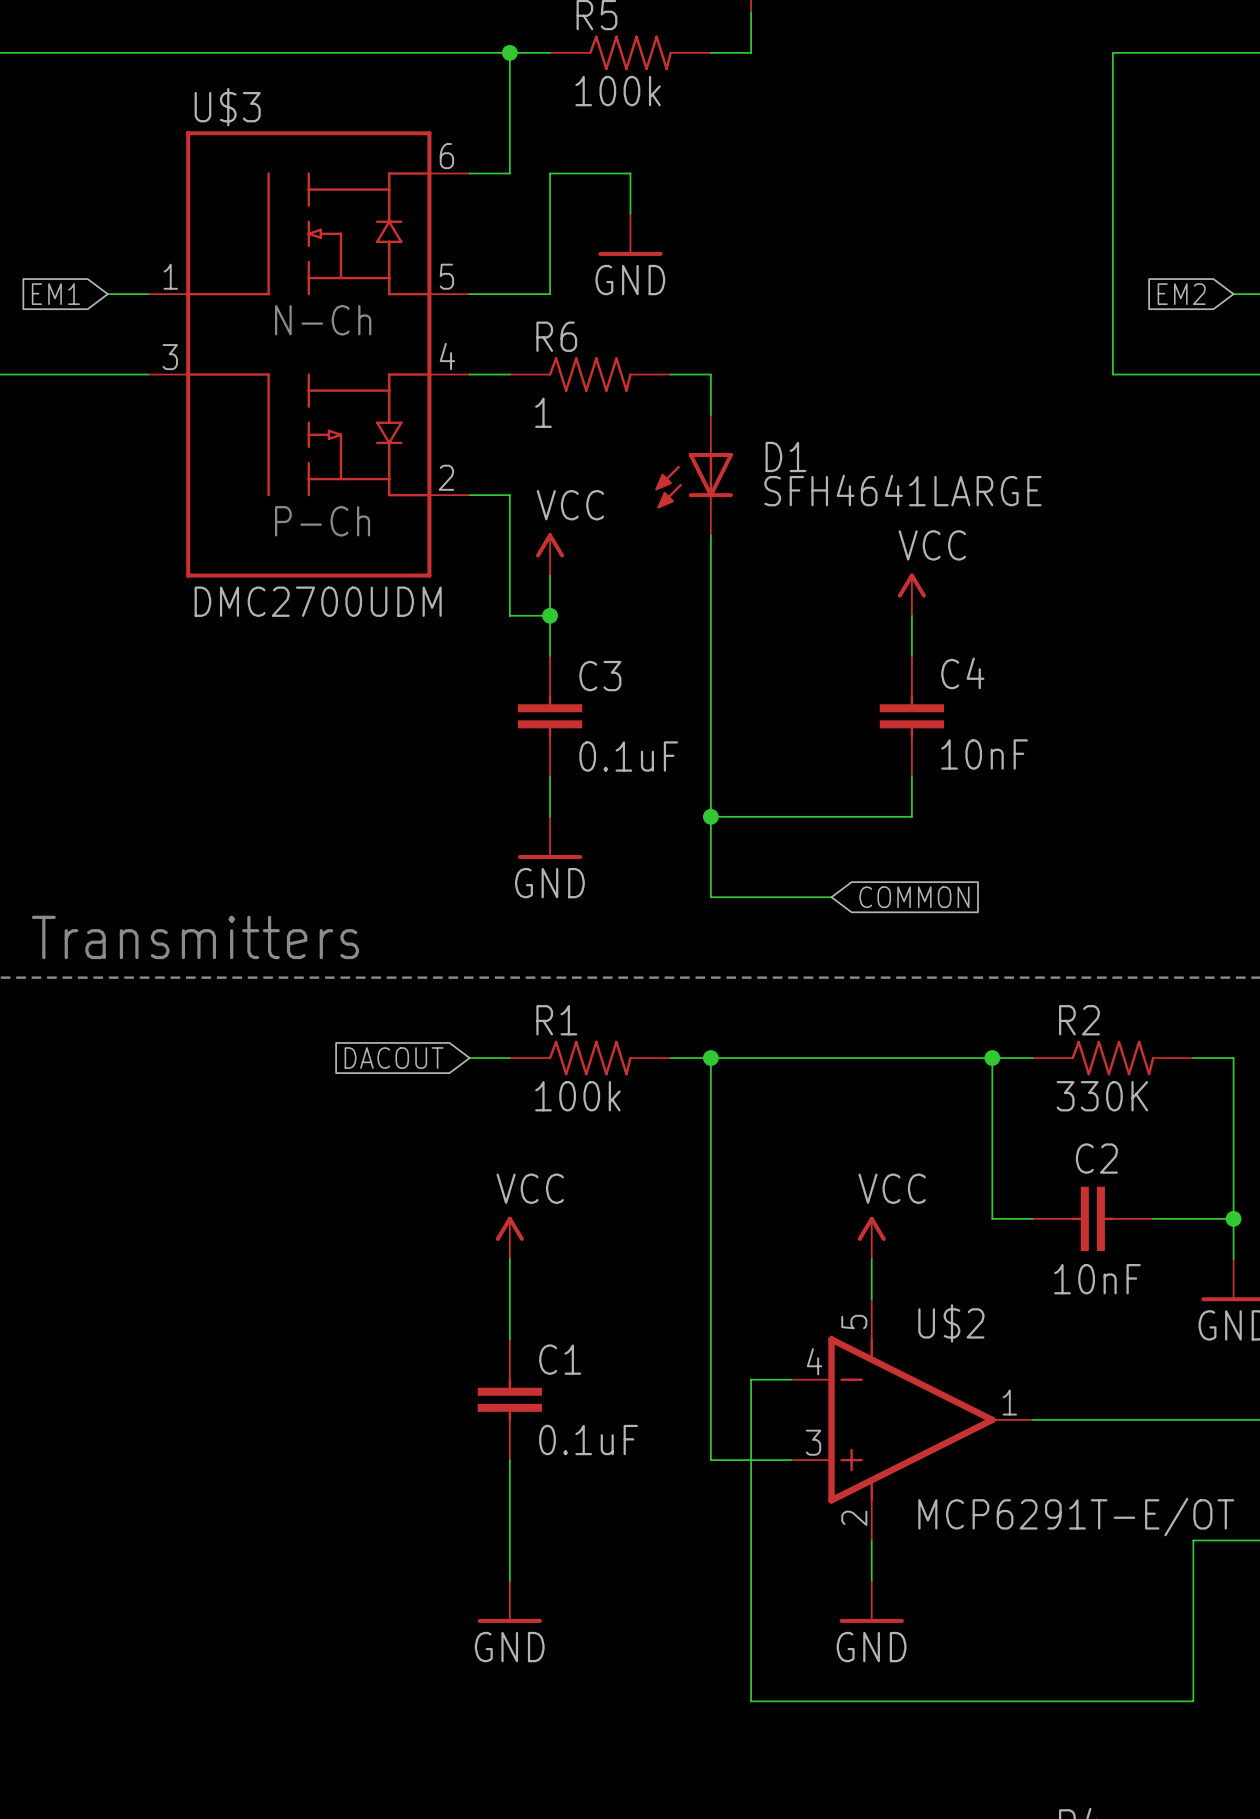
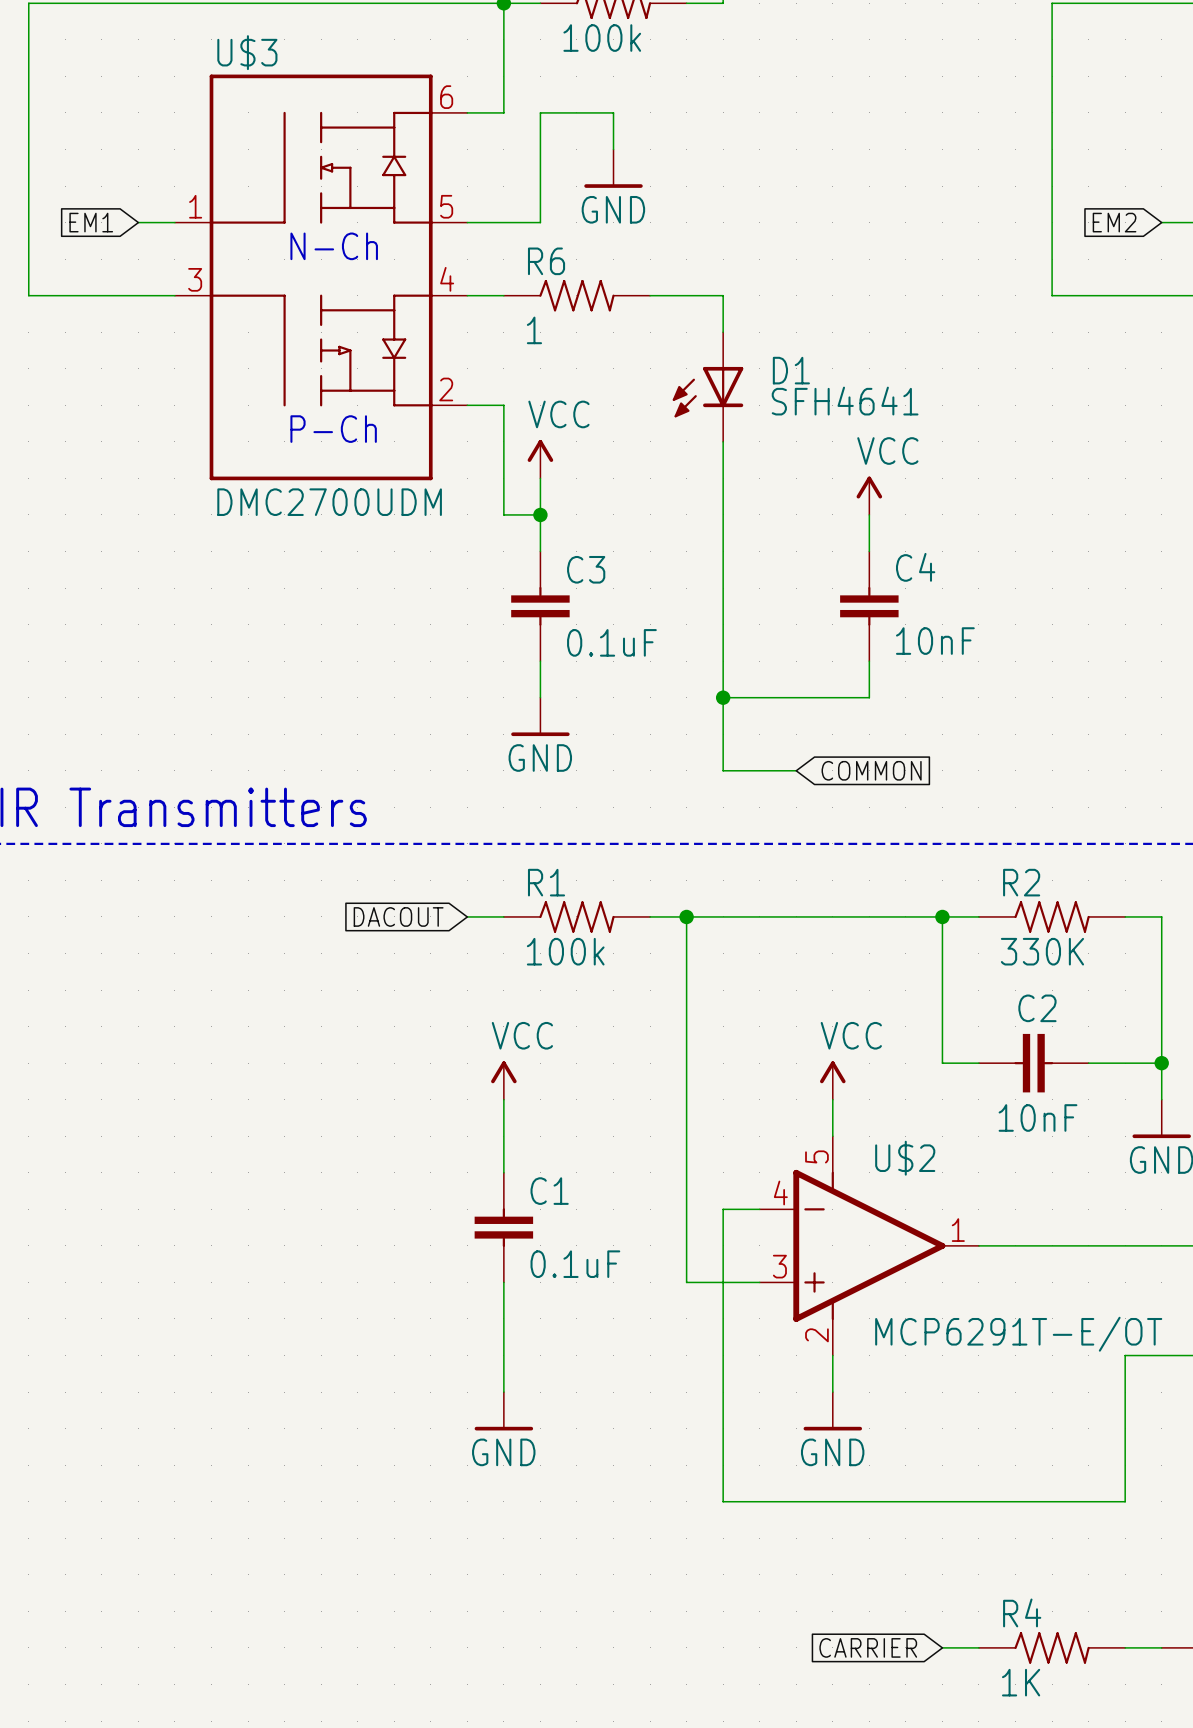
wire: (710, 374) (710, 414) -> (686, 295) (723, 295) (723, 332)
D1 position: (694, 475) -> (707, 387)
D1 value: SFH4641LARGE (902, 490) -> SFH4641 (845, 401)
wire: (710, 535) (710, 897) (751, 897) -> (723, 441) (723, 770)
wire: (710, 816) (751, 816) -> none
junction position: (710, 816) -> (723, 697)

